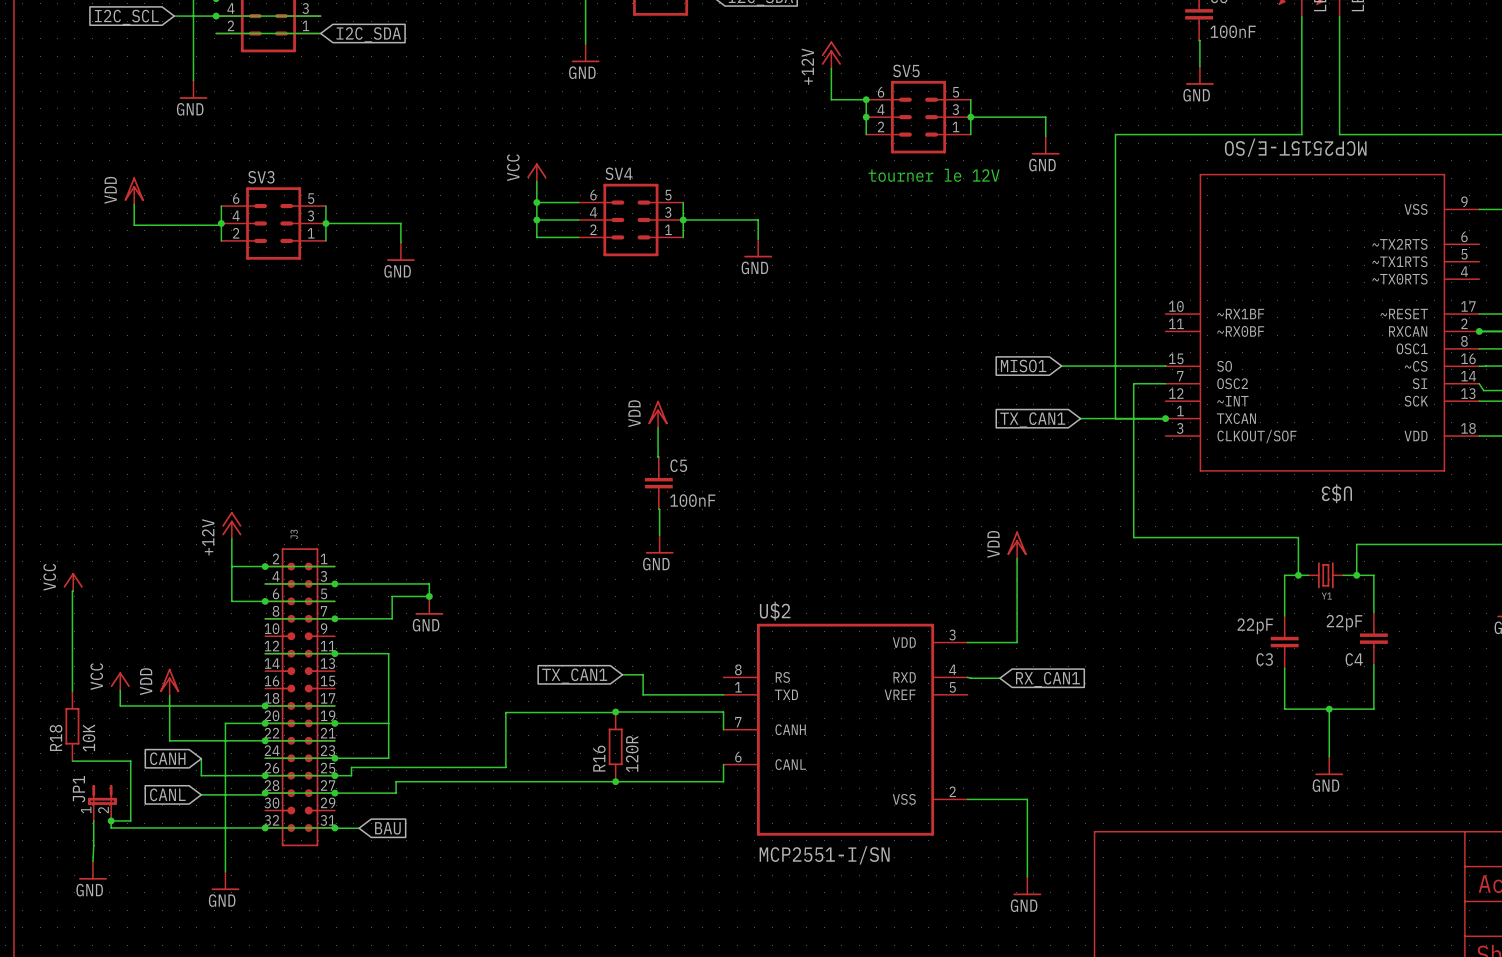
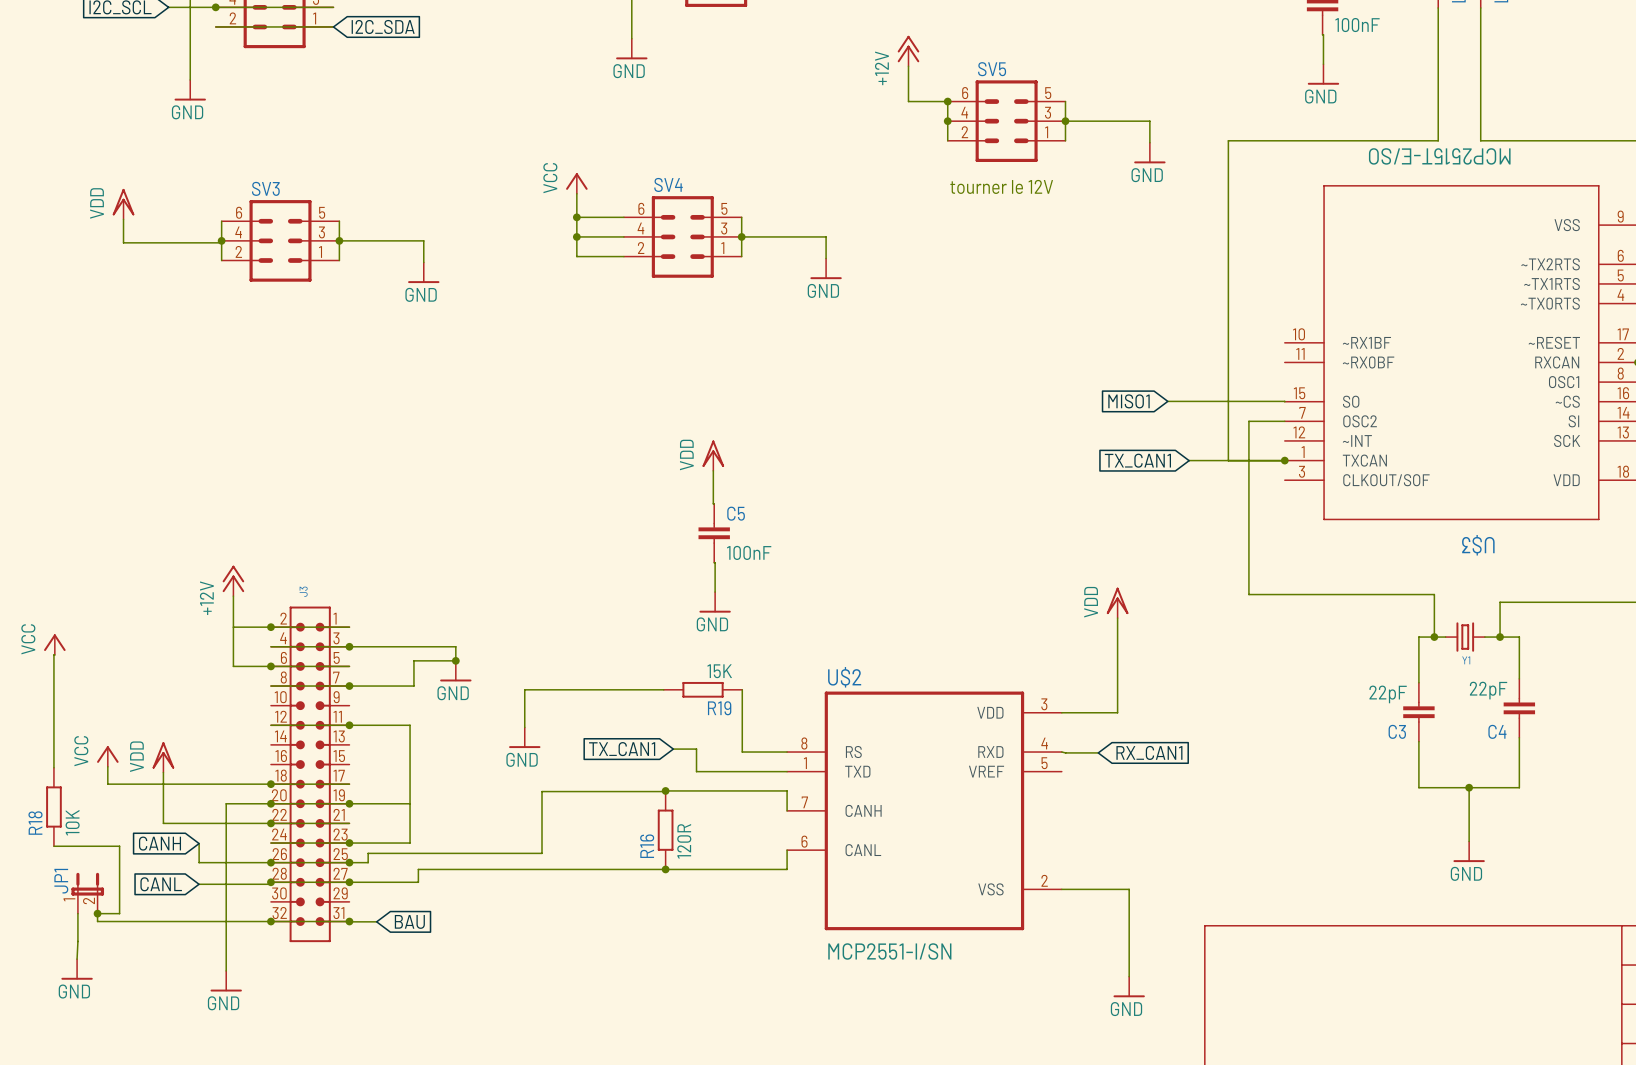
wire: none -> (663, 689) (524, 689) (524, 727)
R19: none -> 15K (703, 689)
wire: none -> (742, 689) (742, 752) (787, 752)
power symbol: none -> GND (524, 737)

